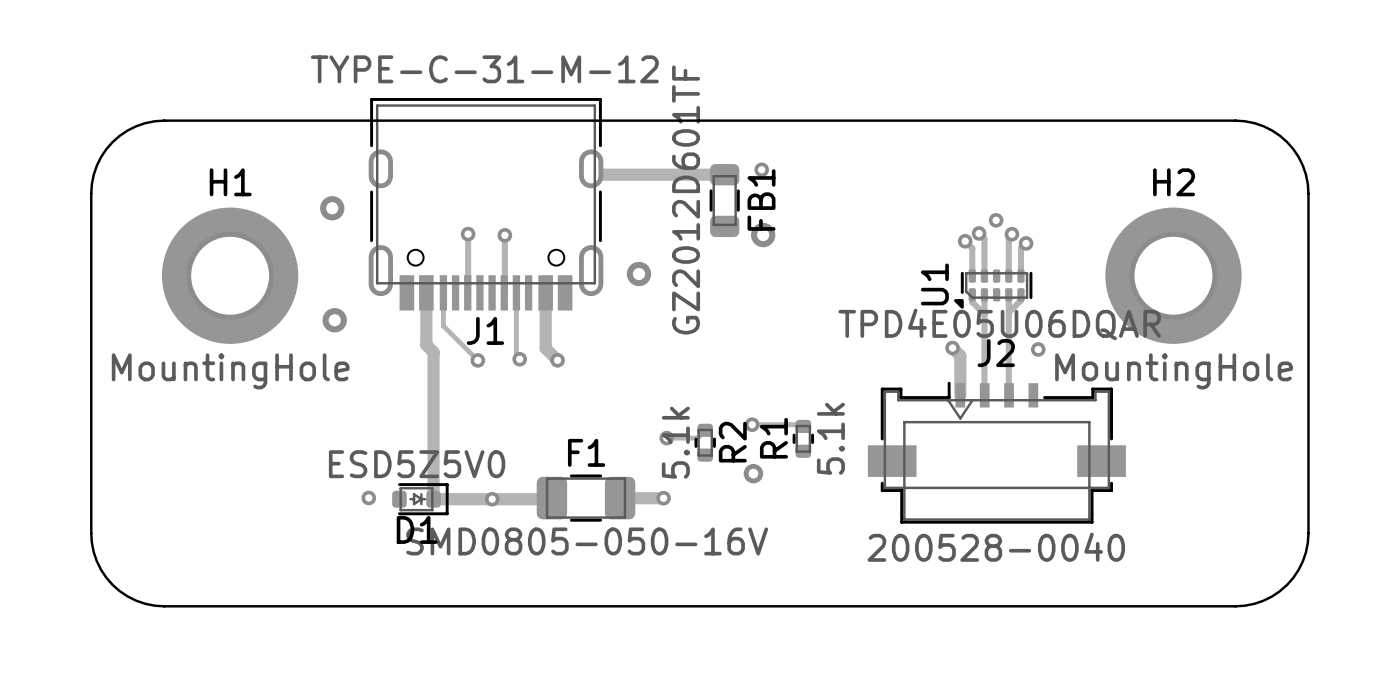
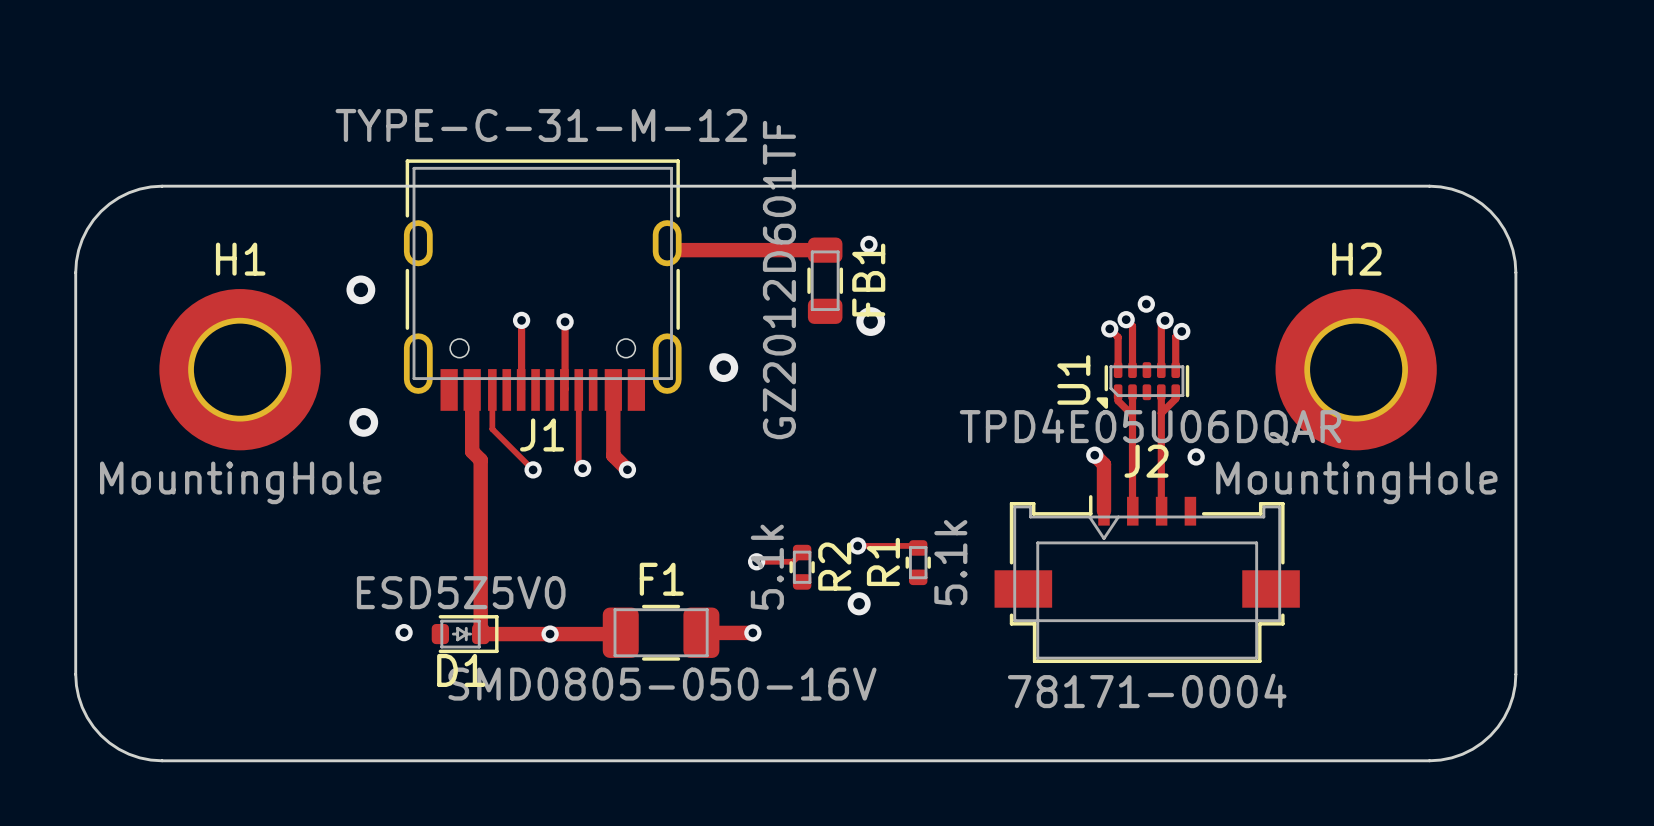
J2 value: 200528-0040 (996, 547) -> 78171-0004 (1147, 690)

